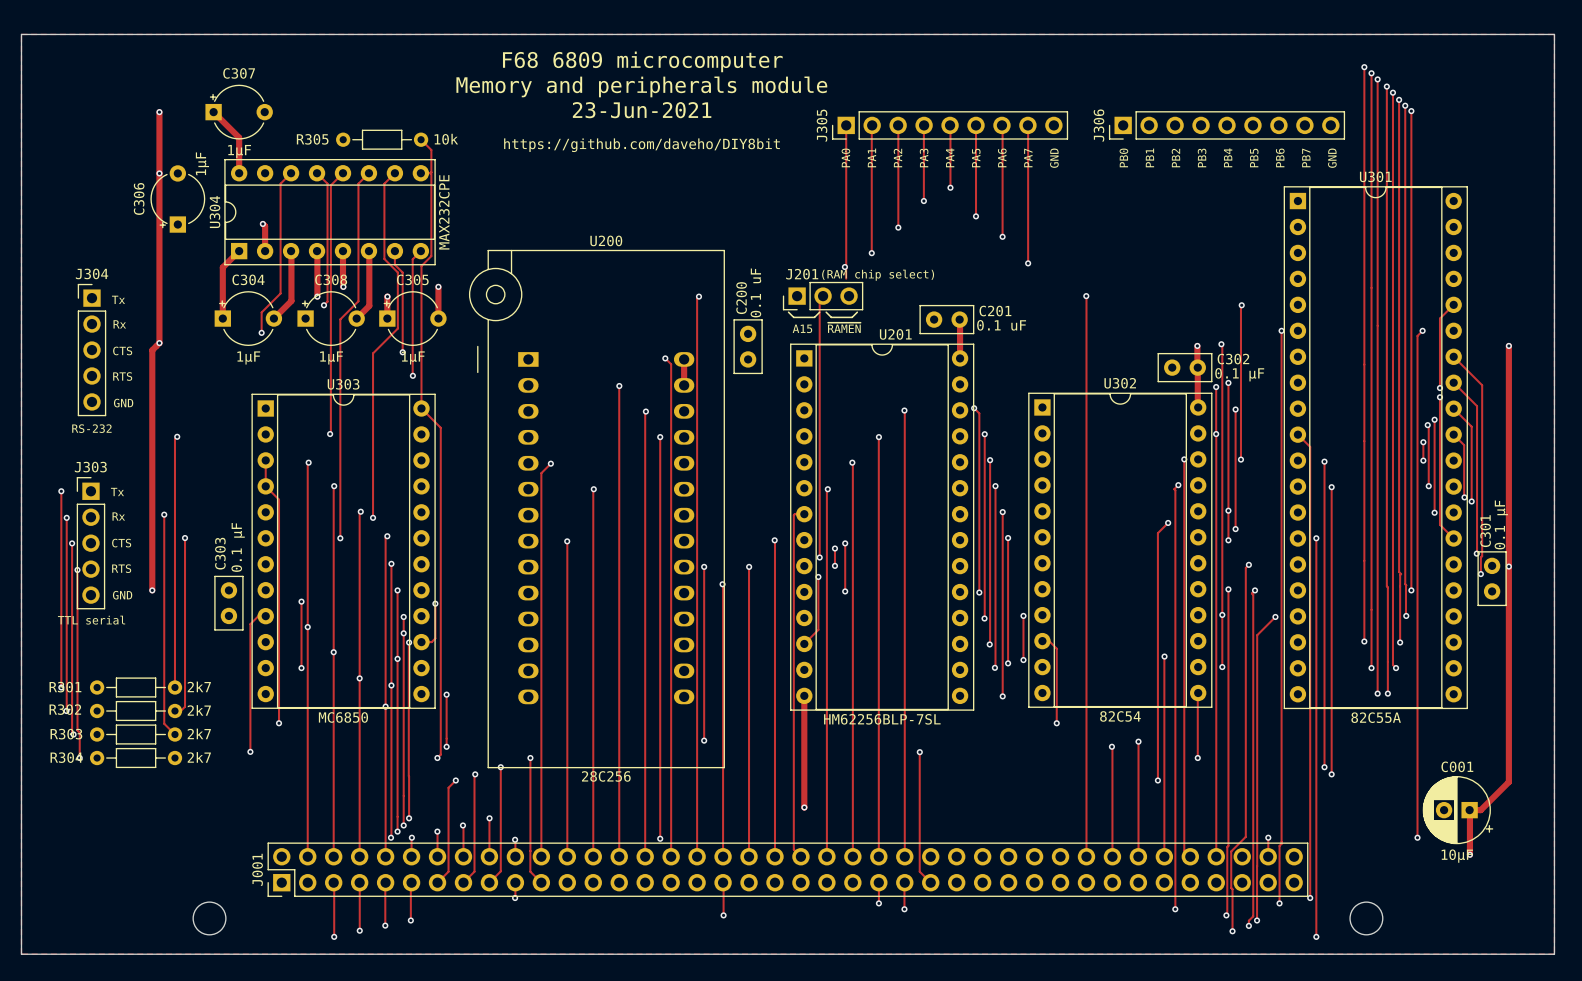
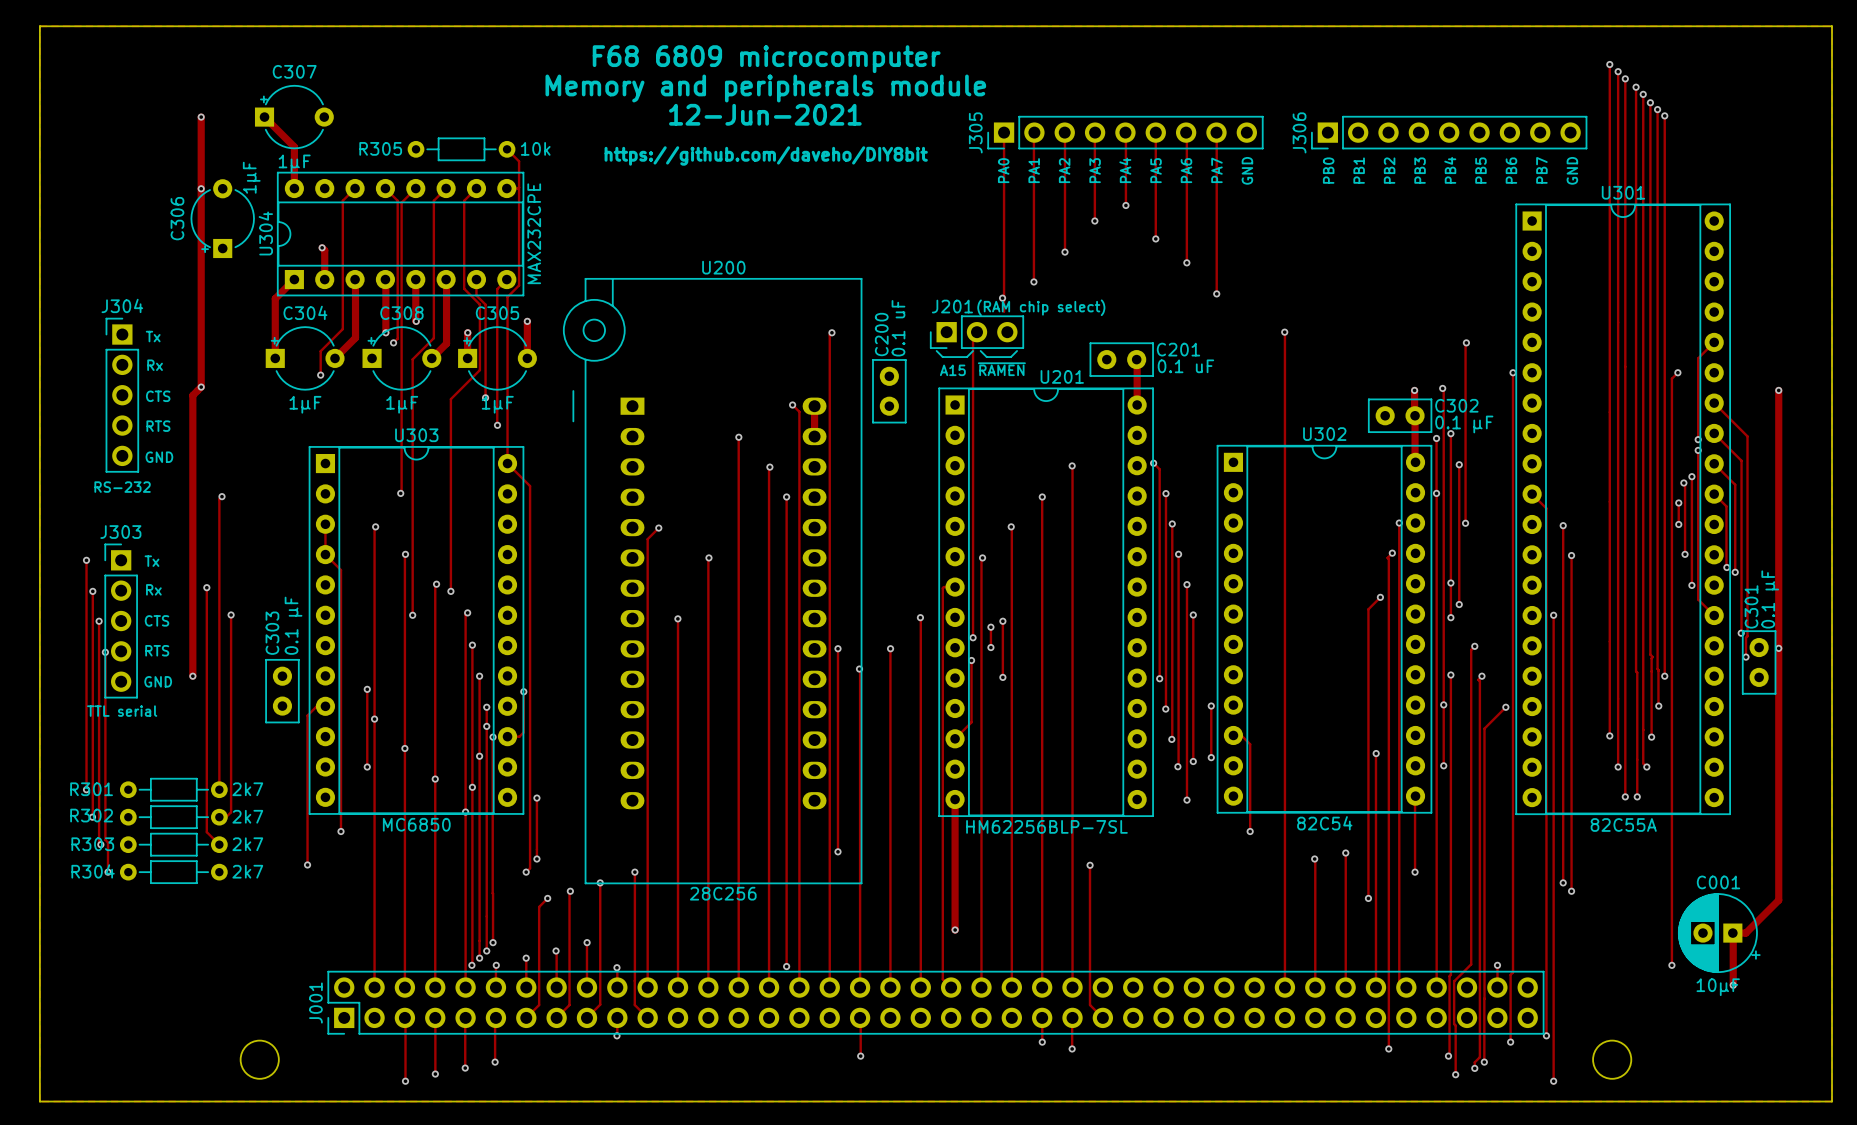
text: 23-Jun-2021 (642, 110) -> 12-Jun-2021 (765, 114)

